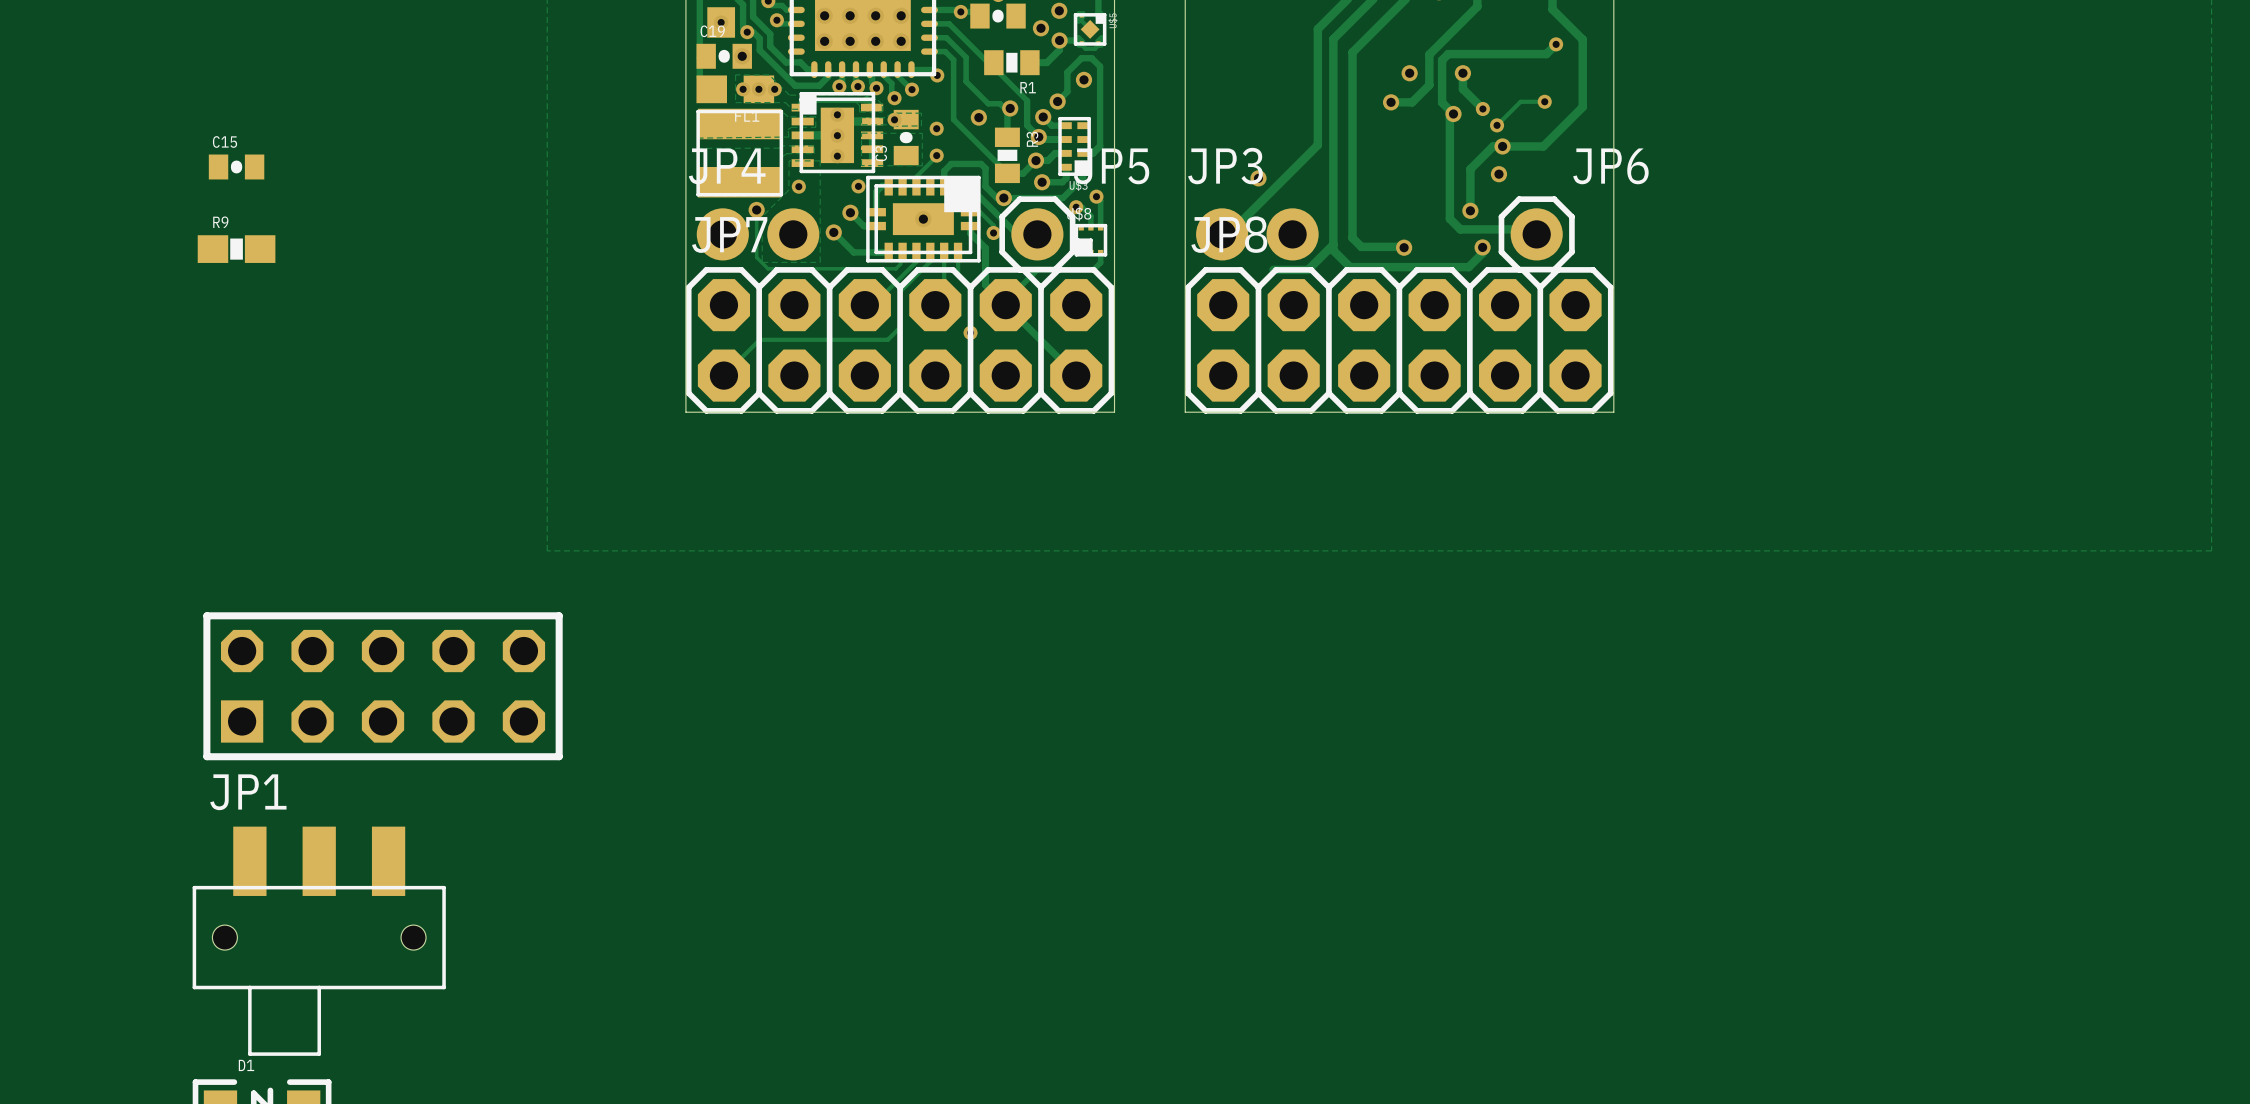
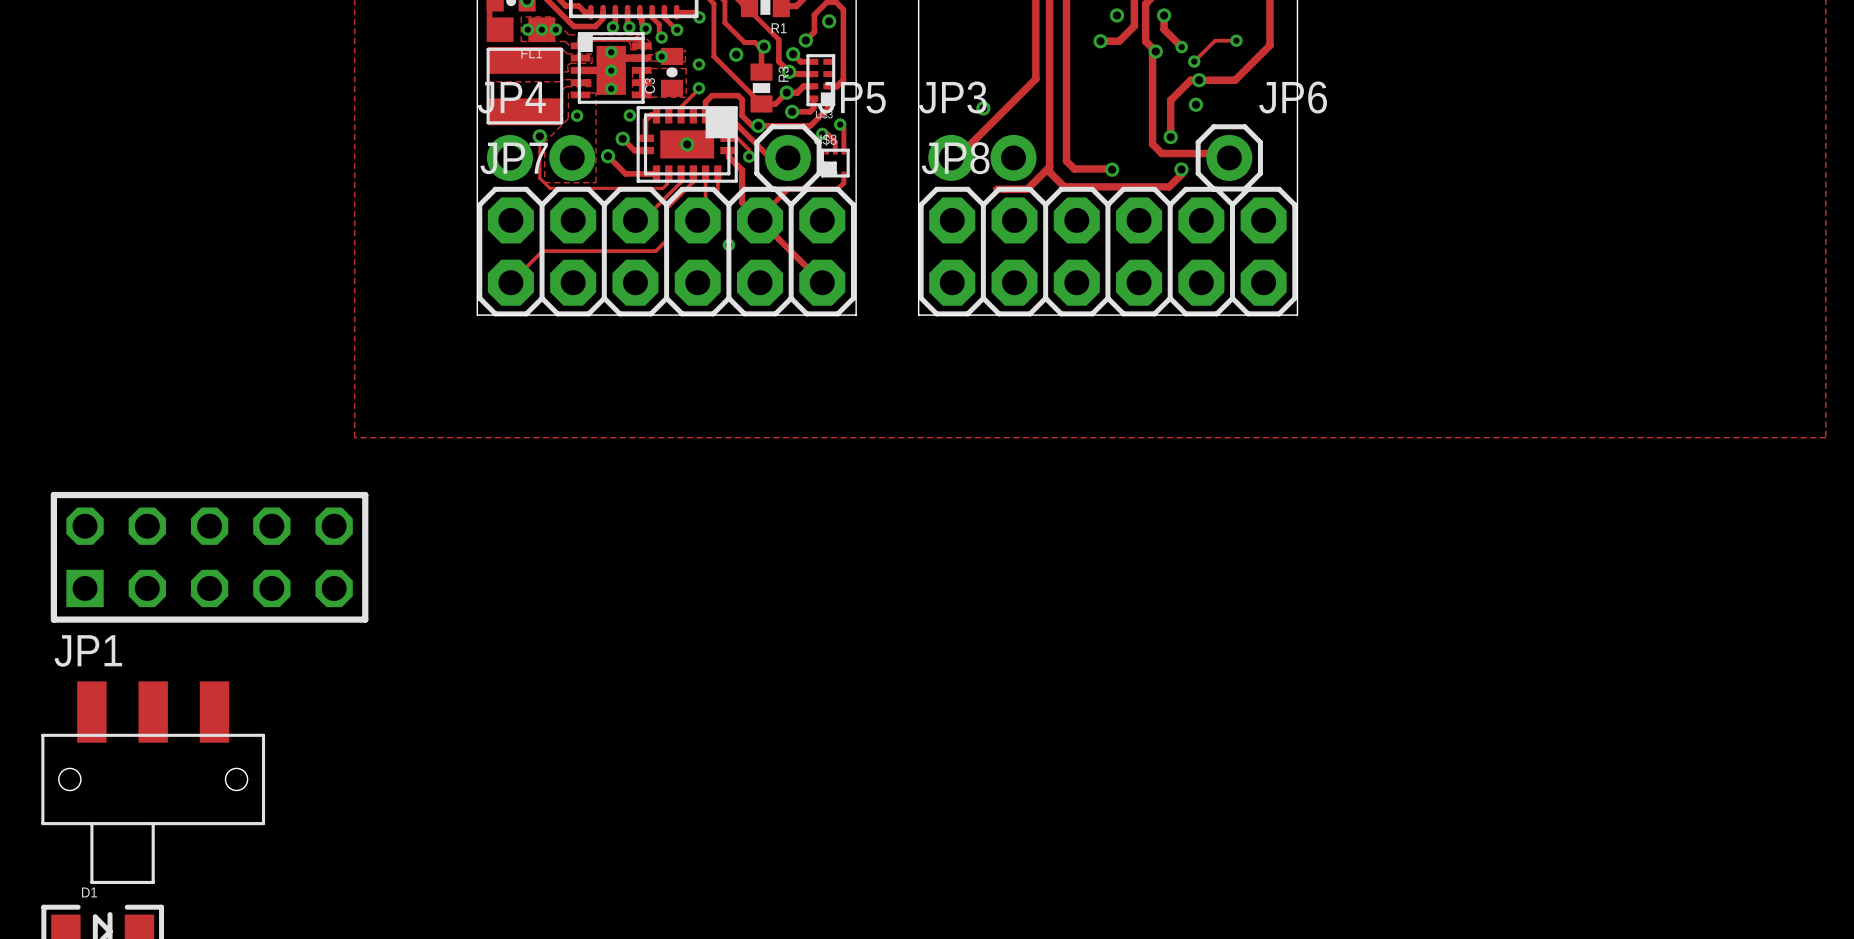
C15: (236, 166) -> none
R9: (236, 249) -> none

